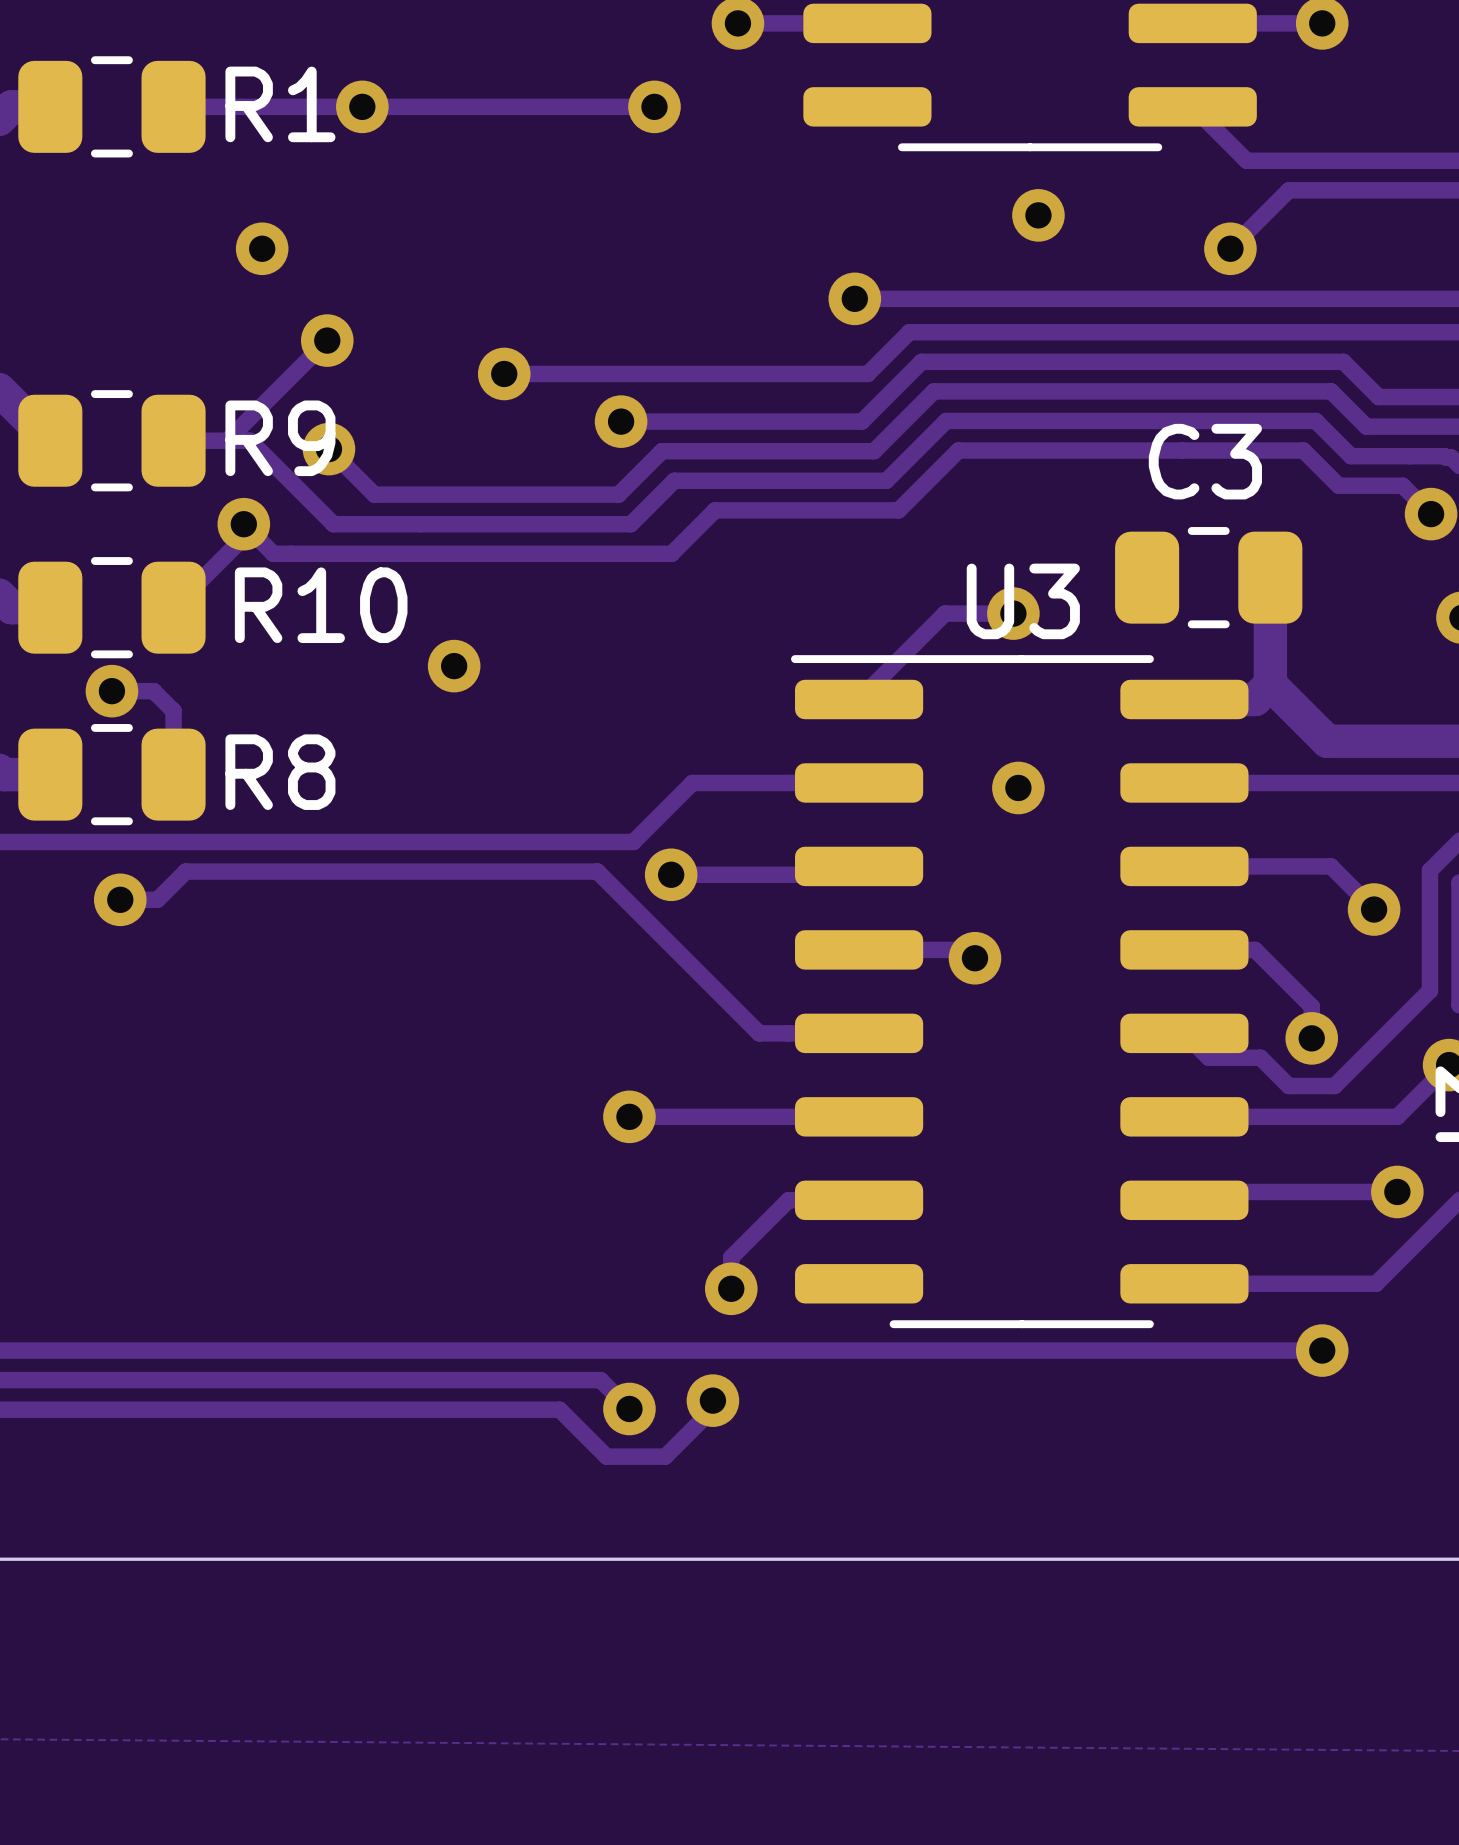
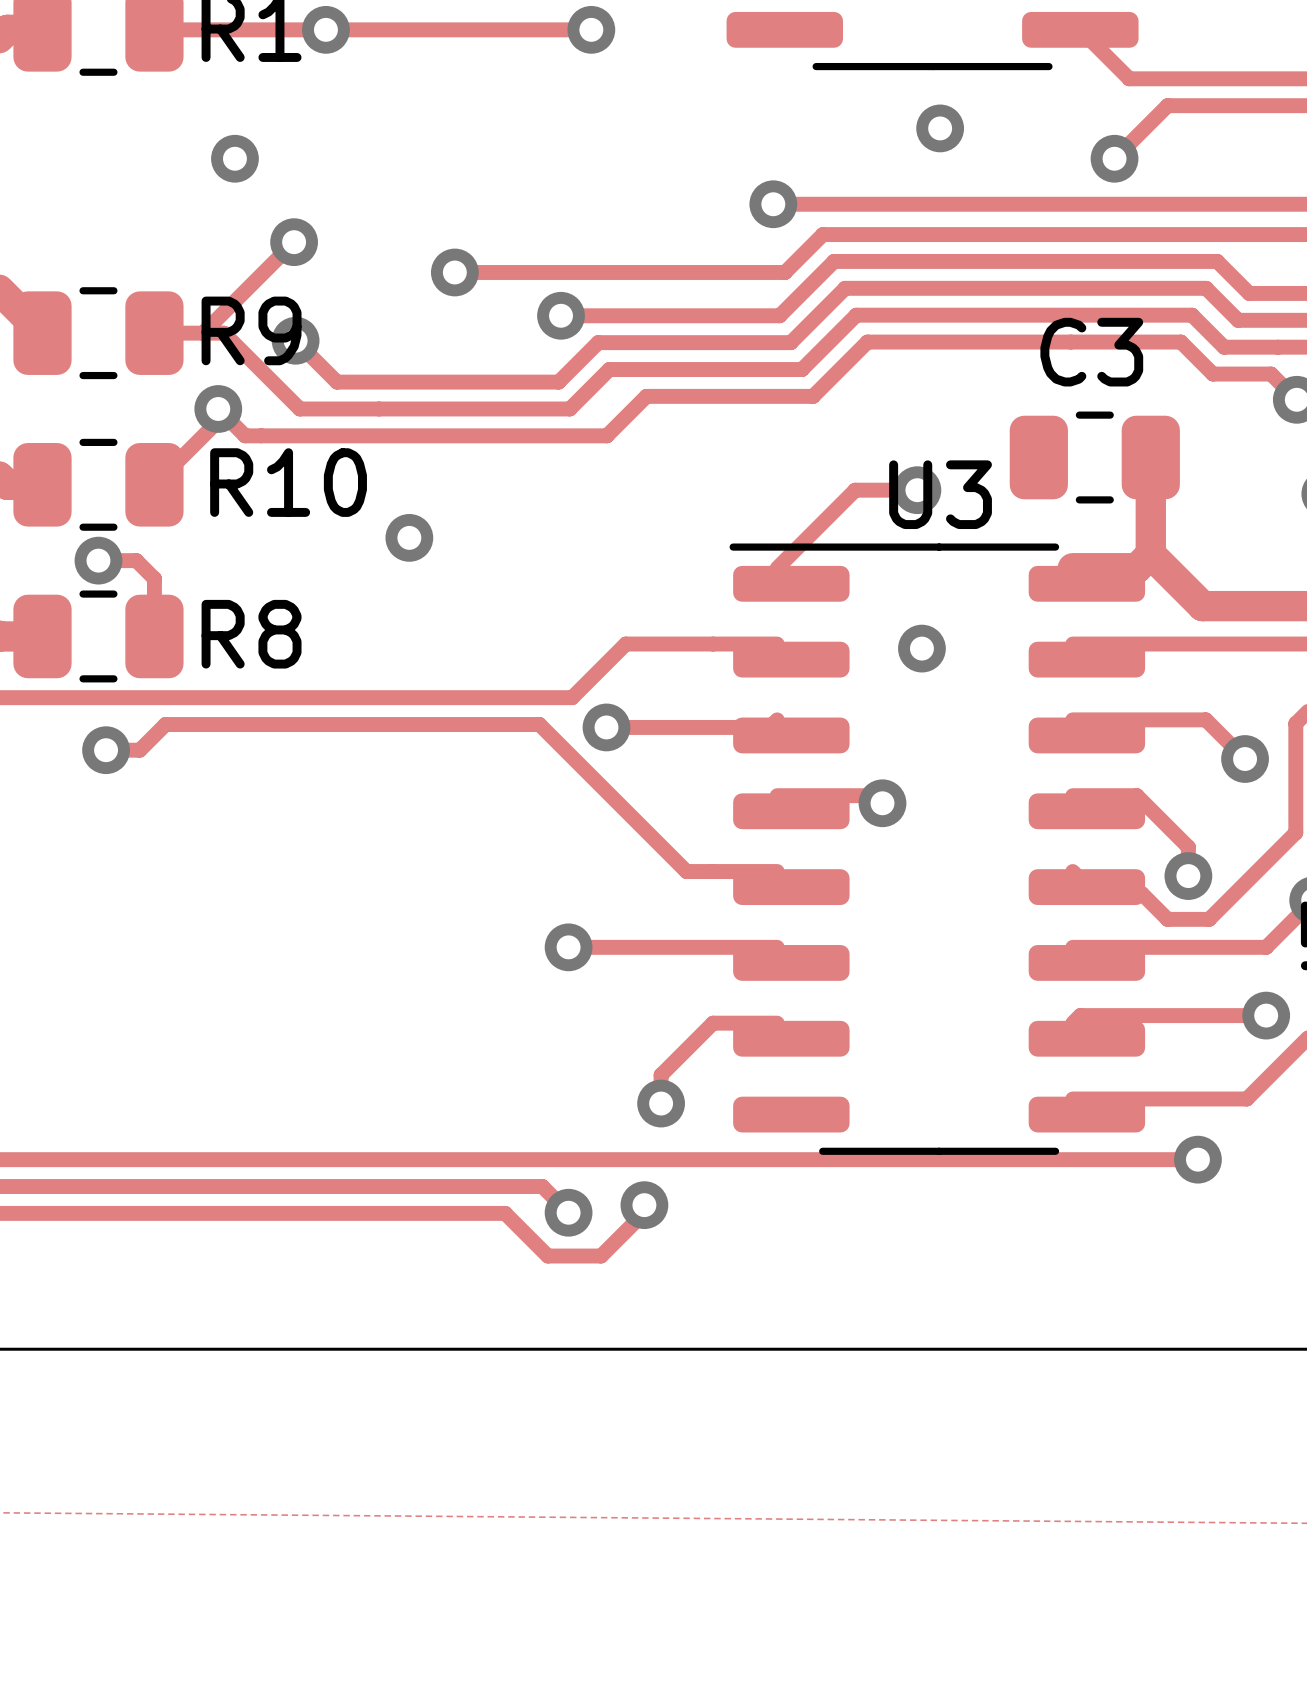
U3 position: (1019, 991) -> (937, 849)

